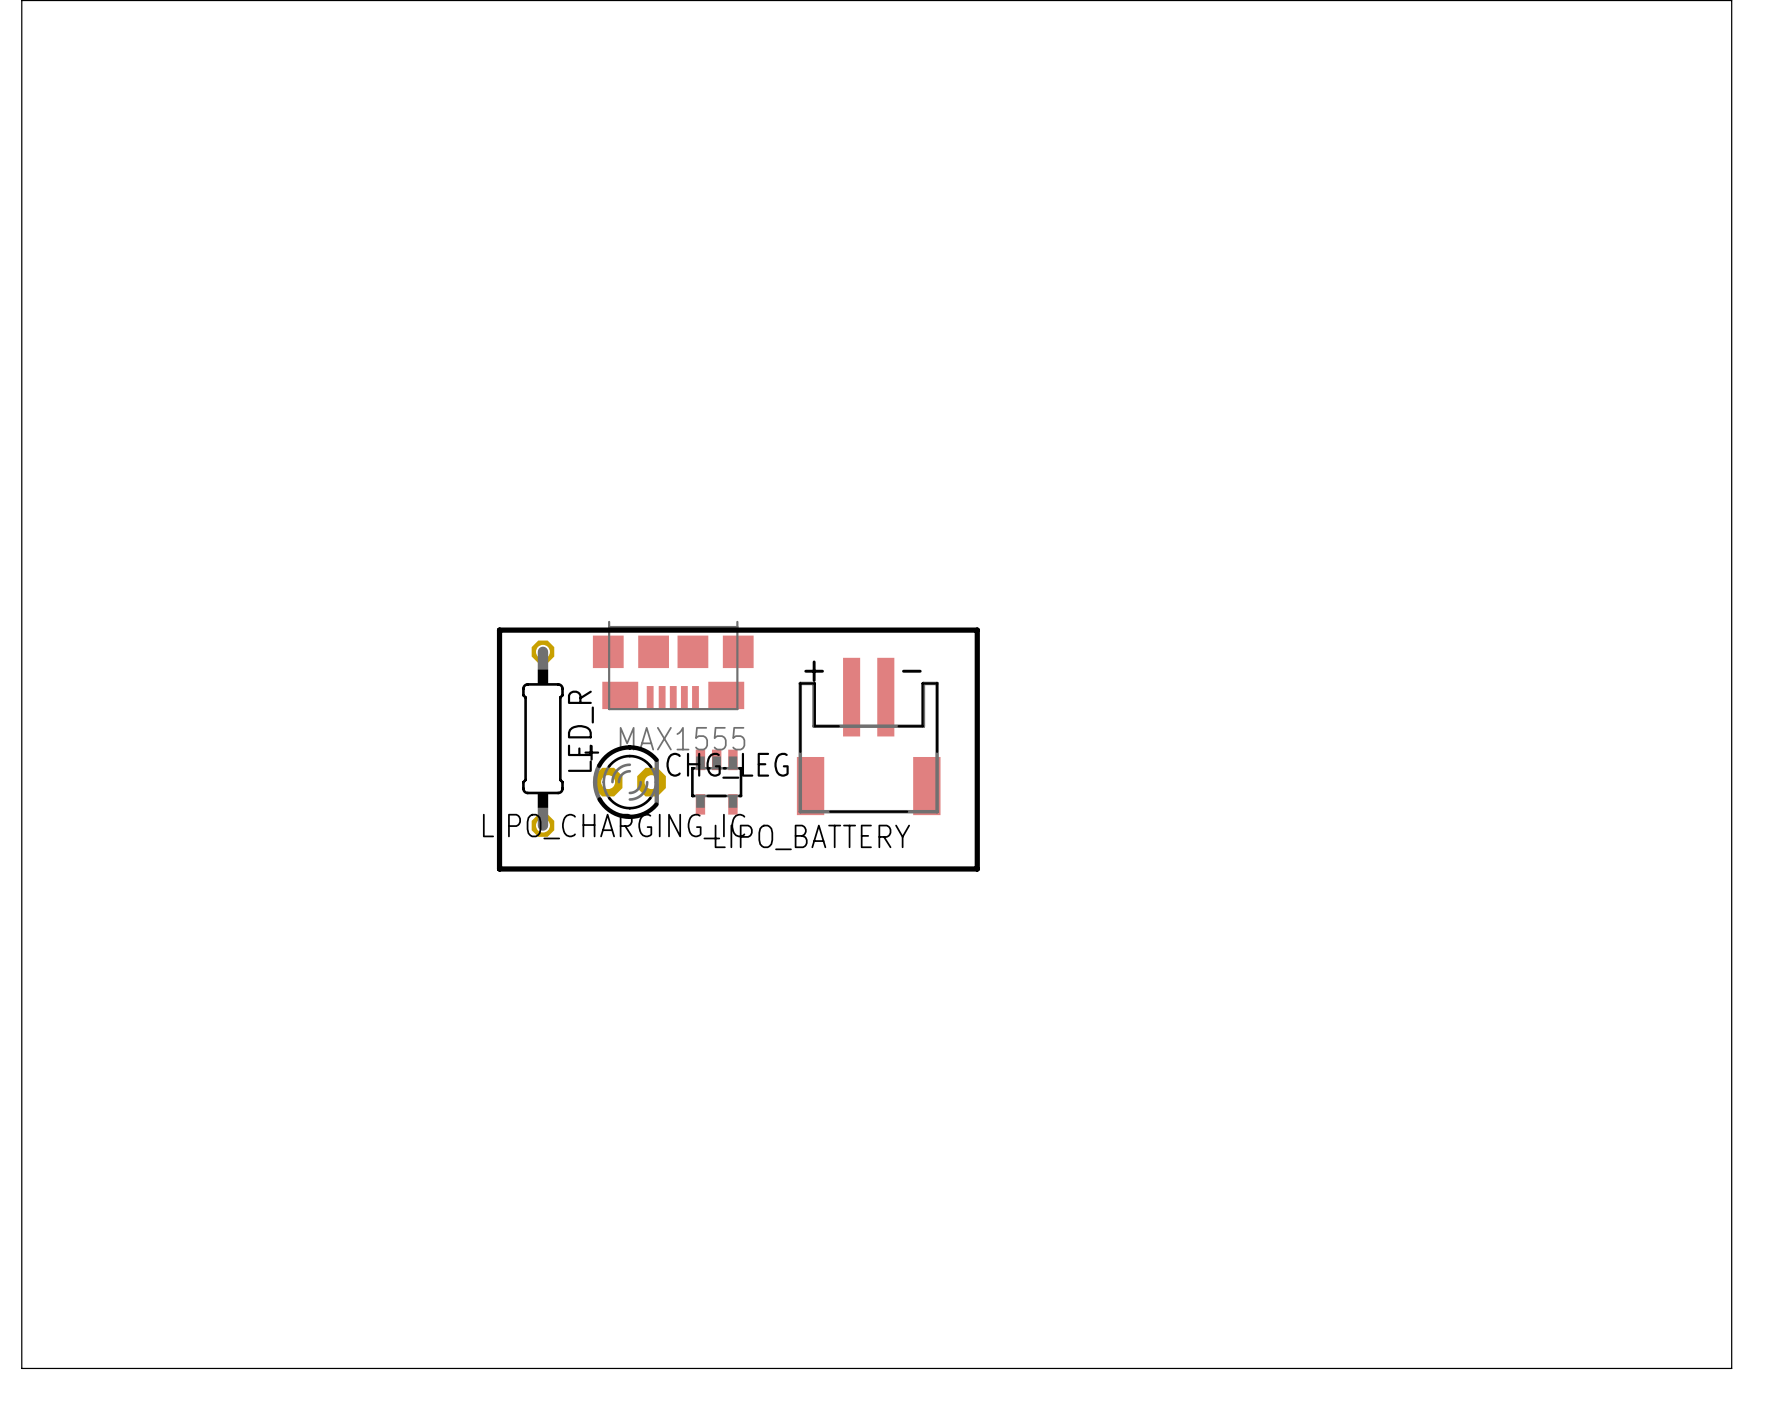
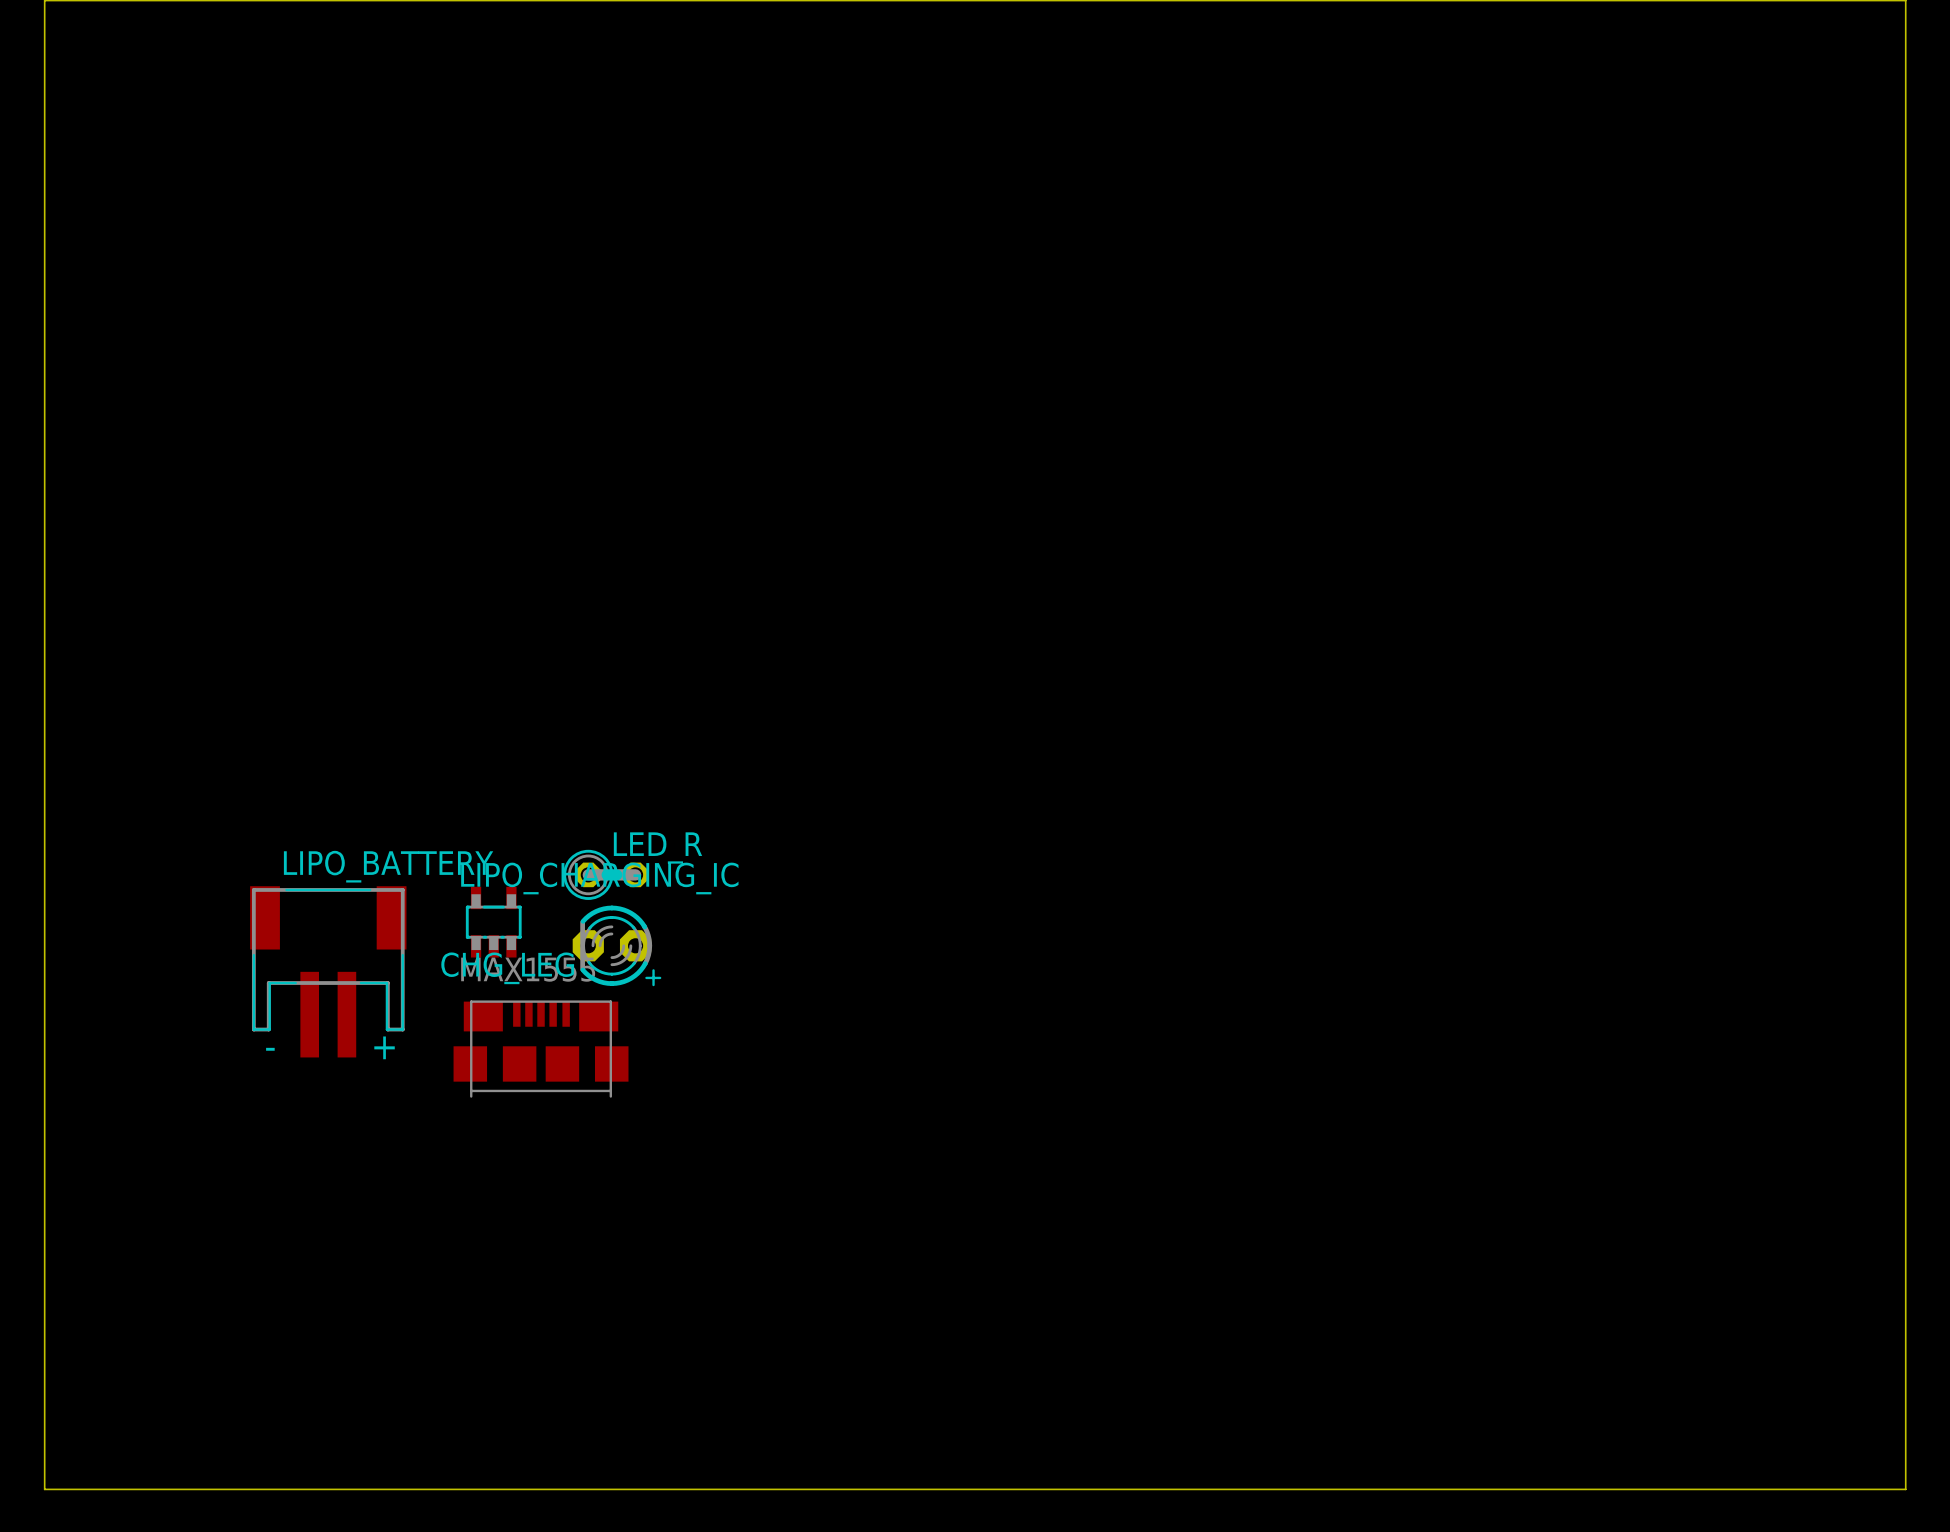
board edge: (499, 630) (499, 868) (977, 868) (977, 630) (499, 630) -> none
part rotation: 0° (673, 665) -> 180° (541, 1049)
part position: (673, 665) -> (541, 1049)
LIPO_BATTERY: (868, 736) -> none
LED_R: (542, 738) -> none
CHG_LEG rotation: 0° (625, 782) -> 180° (617, 945)
CHG_LEG position: (625, 782) -> (617, 945)
LIPO_CHARGING_IC rotation: 0° (716, 782) -> 180° (493, 922)
LIPO_CHARGING_IC position: (716, 782) -> (493, 922)
LED_R: none -> (605, 874)
LIPO_BATTERY: none -> (328, 971)

